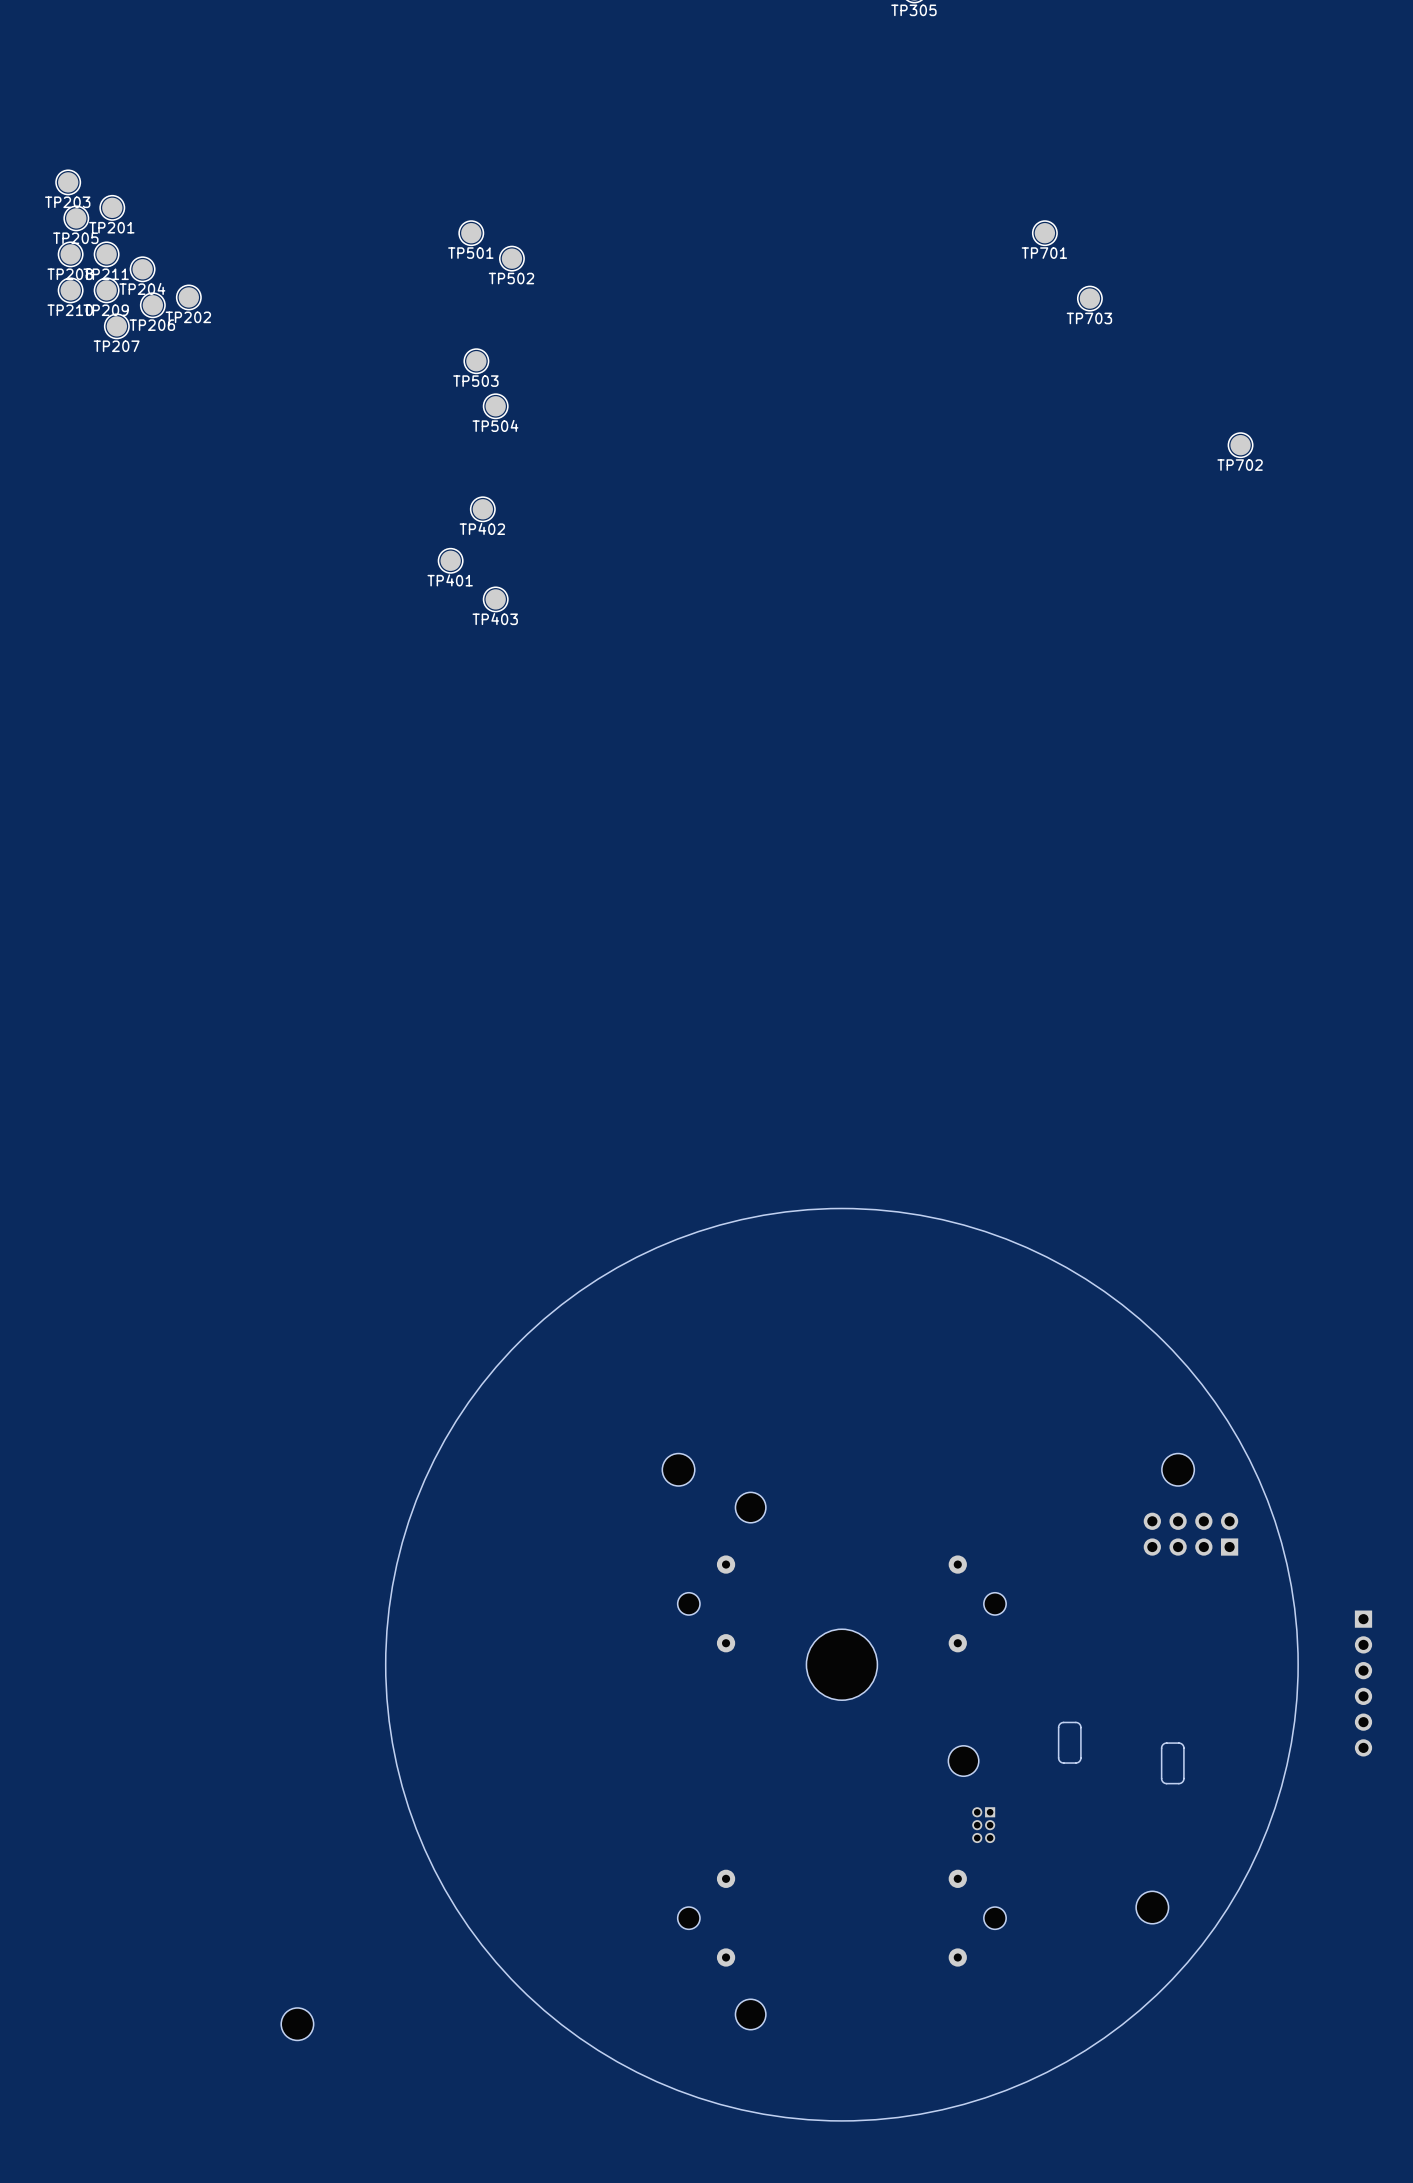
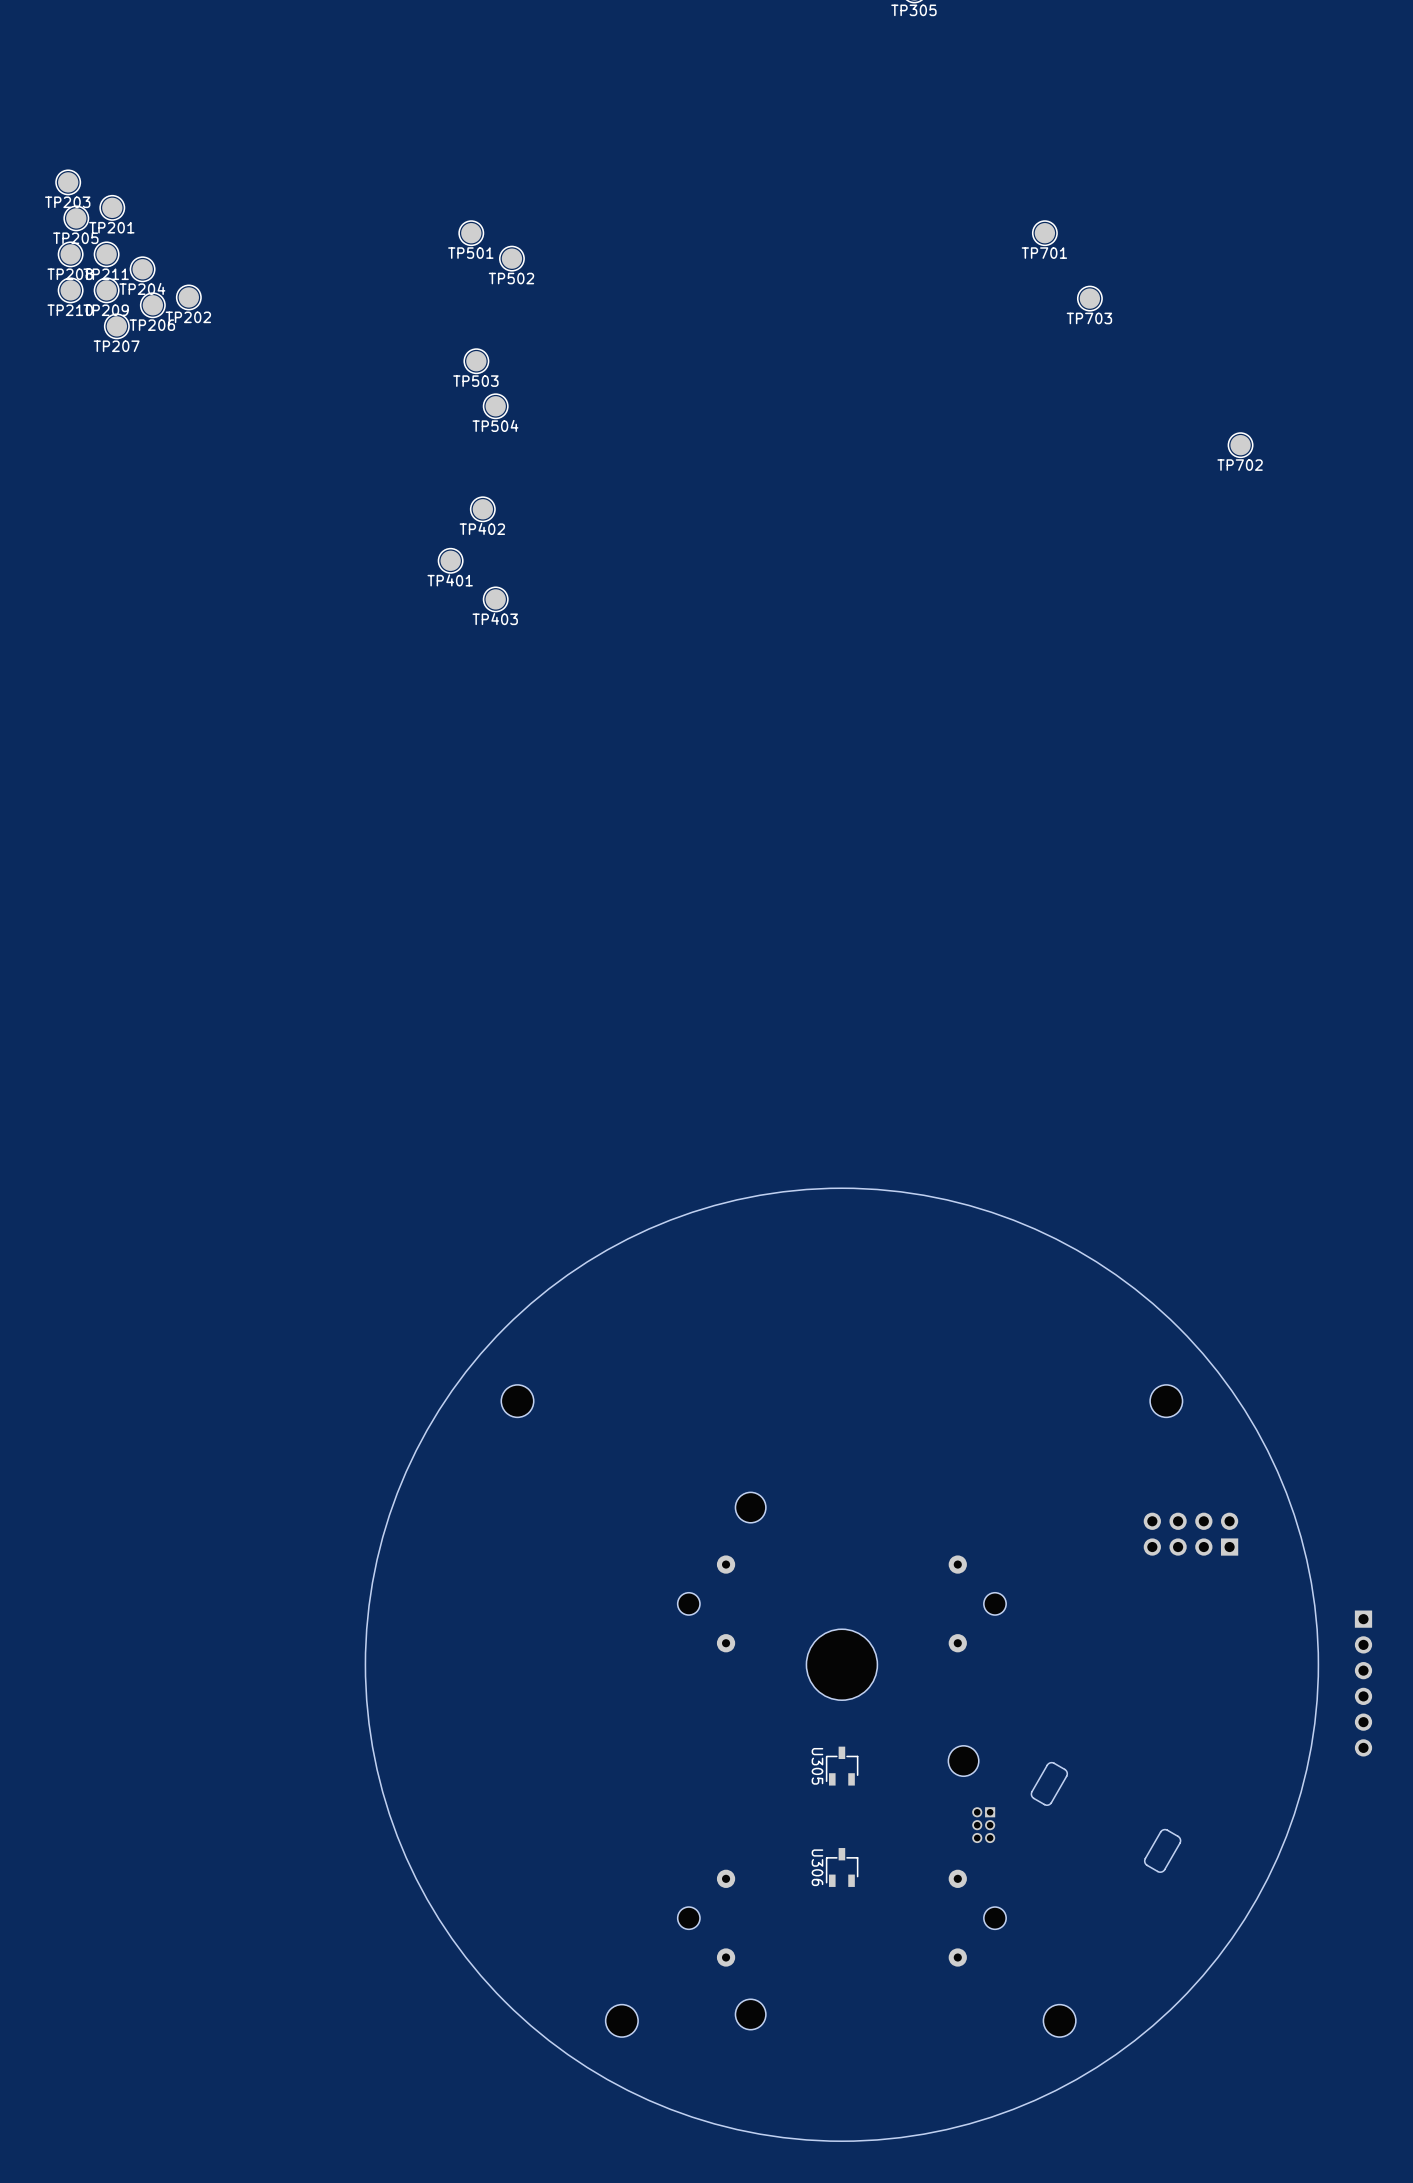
round board edge size: [385, 1208, 1299, 2122] -> [365, 1187, 1319, 2142]
part position: (678, 1469) -> (517, 1401)
part position: (1178, 1469) -> (1166, 1401)
part: (1069, 1742) -> none
part: (1172, 1763) -> none
U305: none -> (842, 1766)
part: none -> (1049, 1783)
part: none -> (1162, 1850)
U306: none -> (842, 1867)
part position: (1152, 1907) -> (1059, 2020)
part: none -> (621, 2020)
part: (297, 2024) -> none

